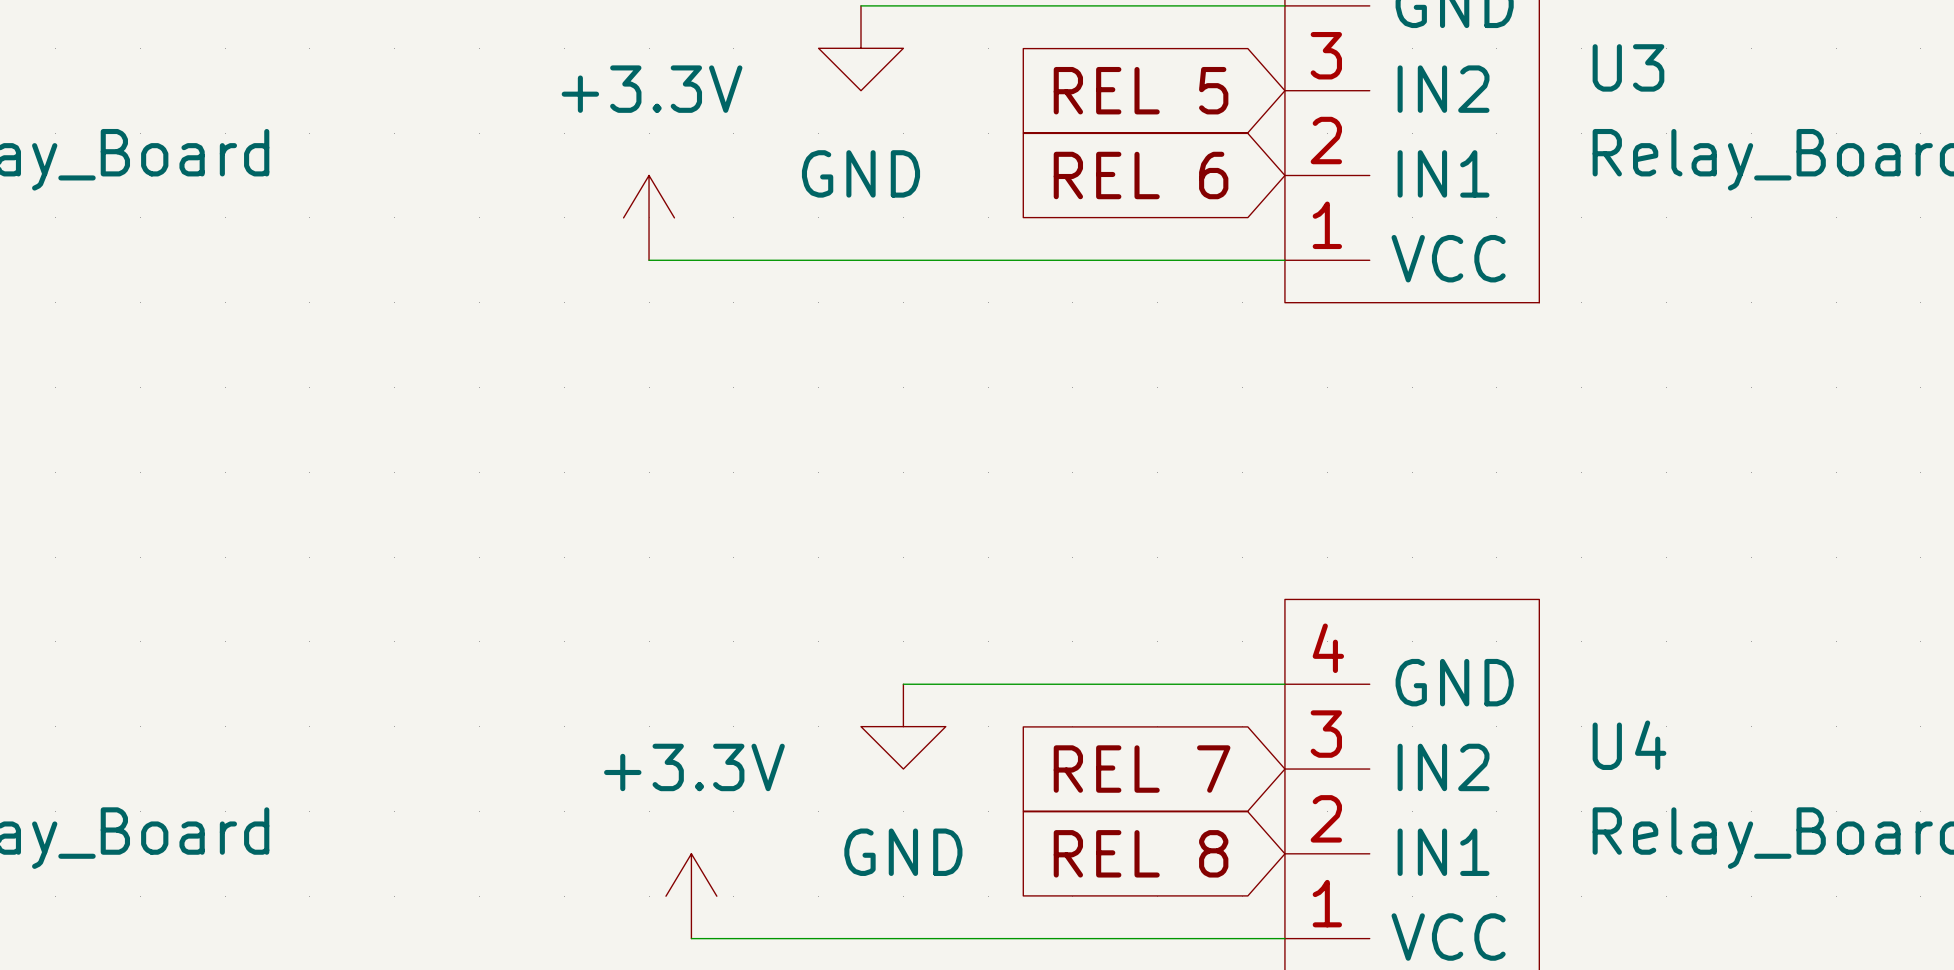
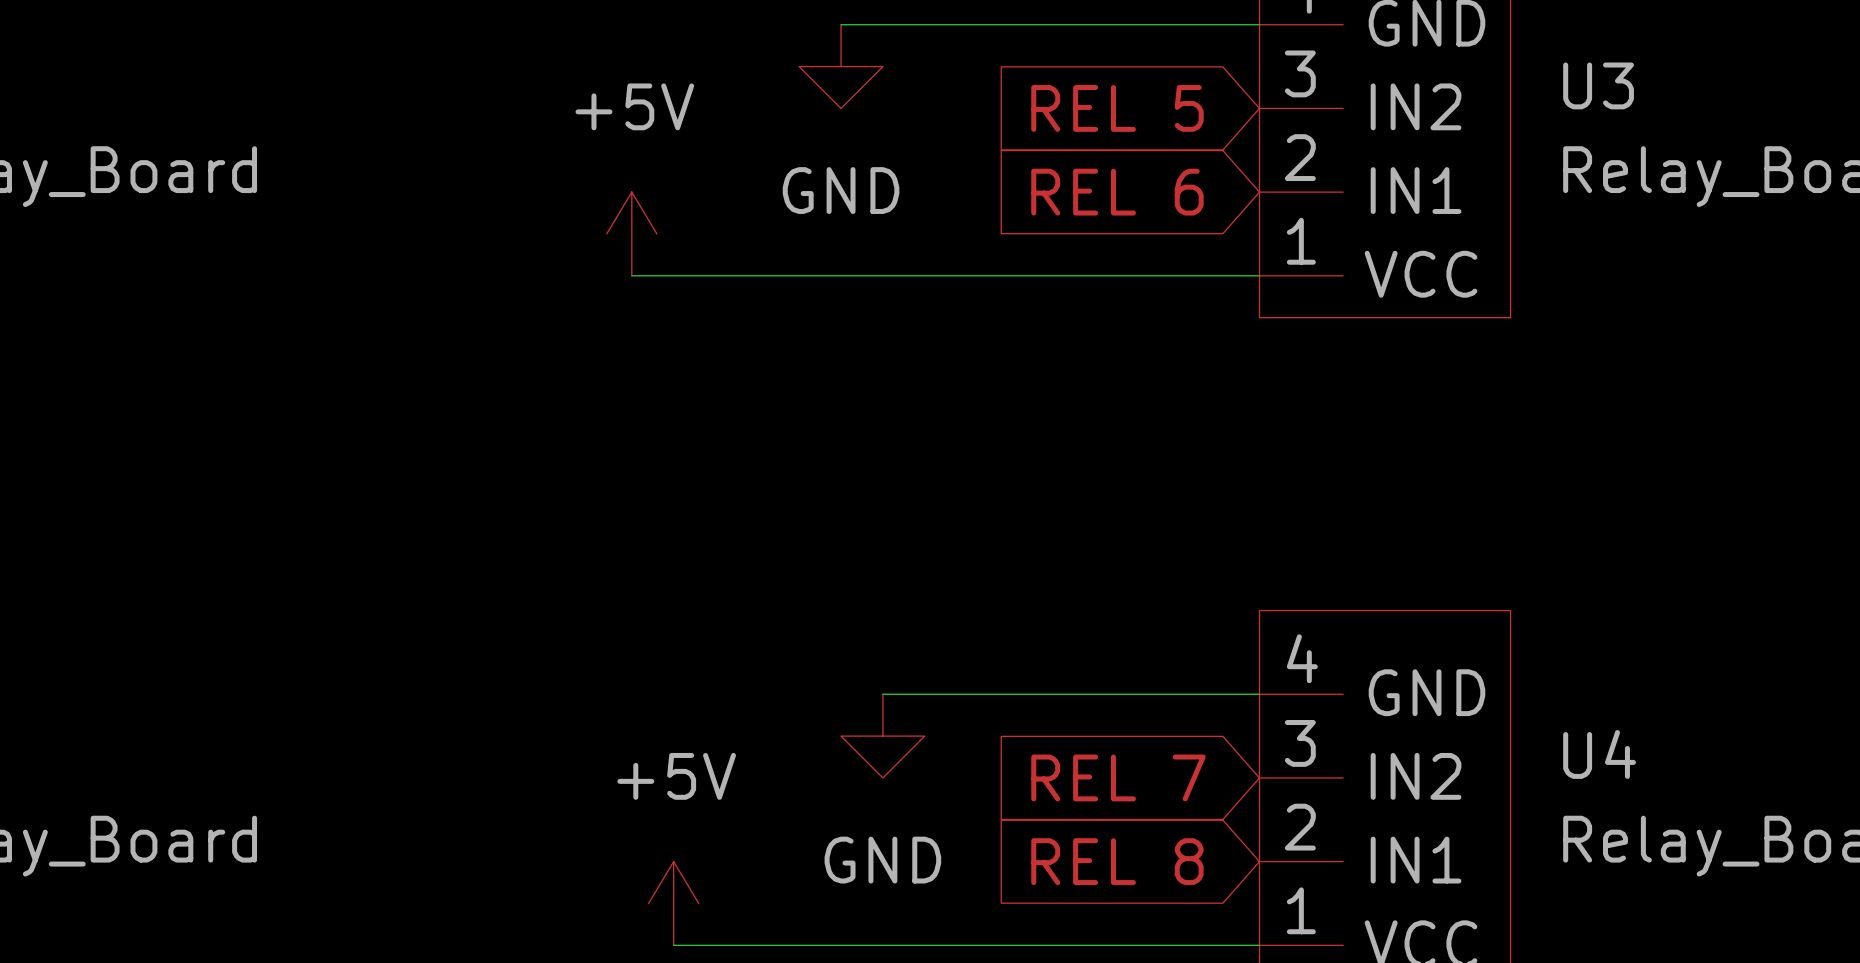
power symbol: +3.3V (649, 217) -> +5V (631, 233)
power symbol: +3.3V (691, 896) -> +5V (673, 903)

